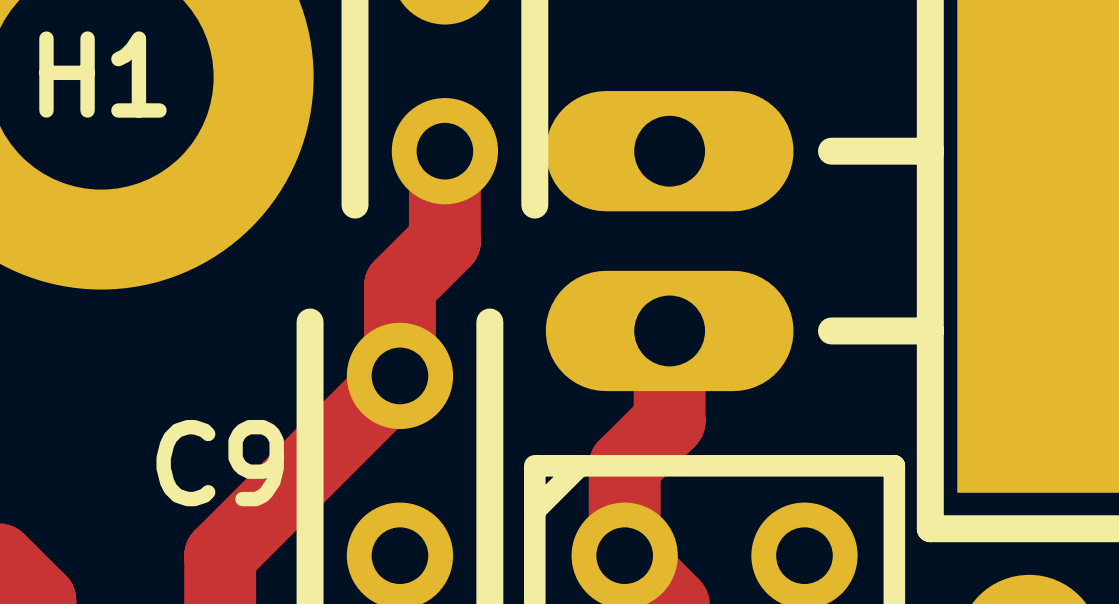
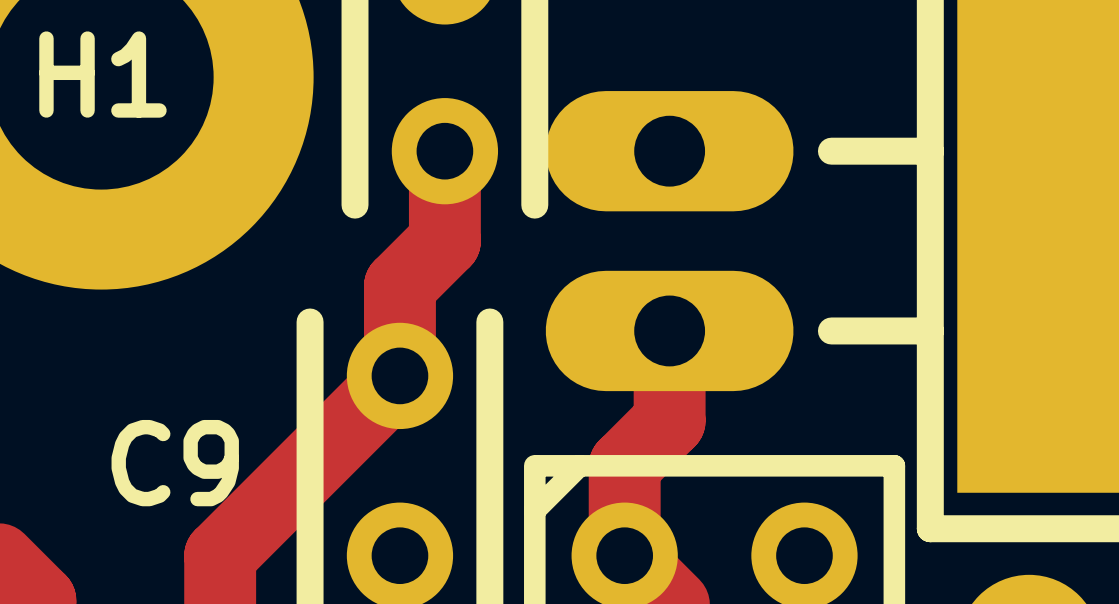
C9 name position: C9 (220, 463) -> C9 (175, 463)

